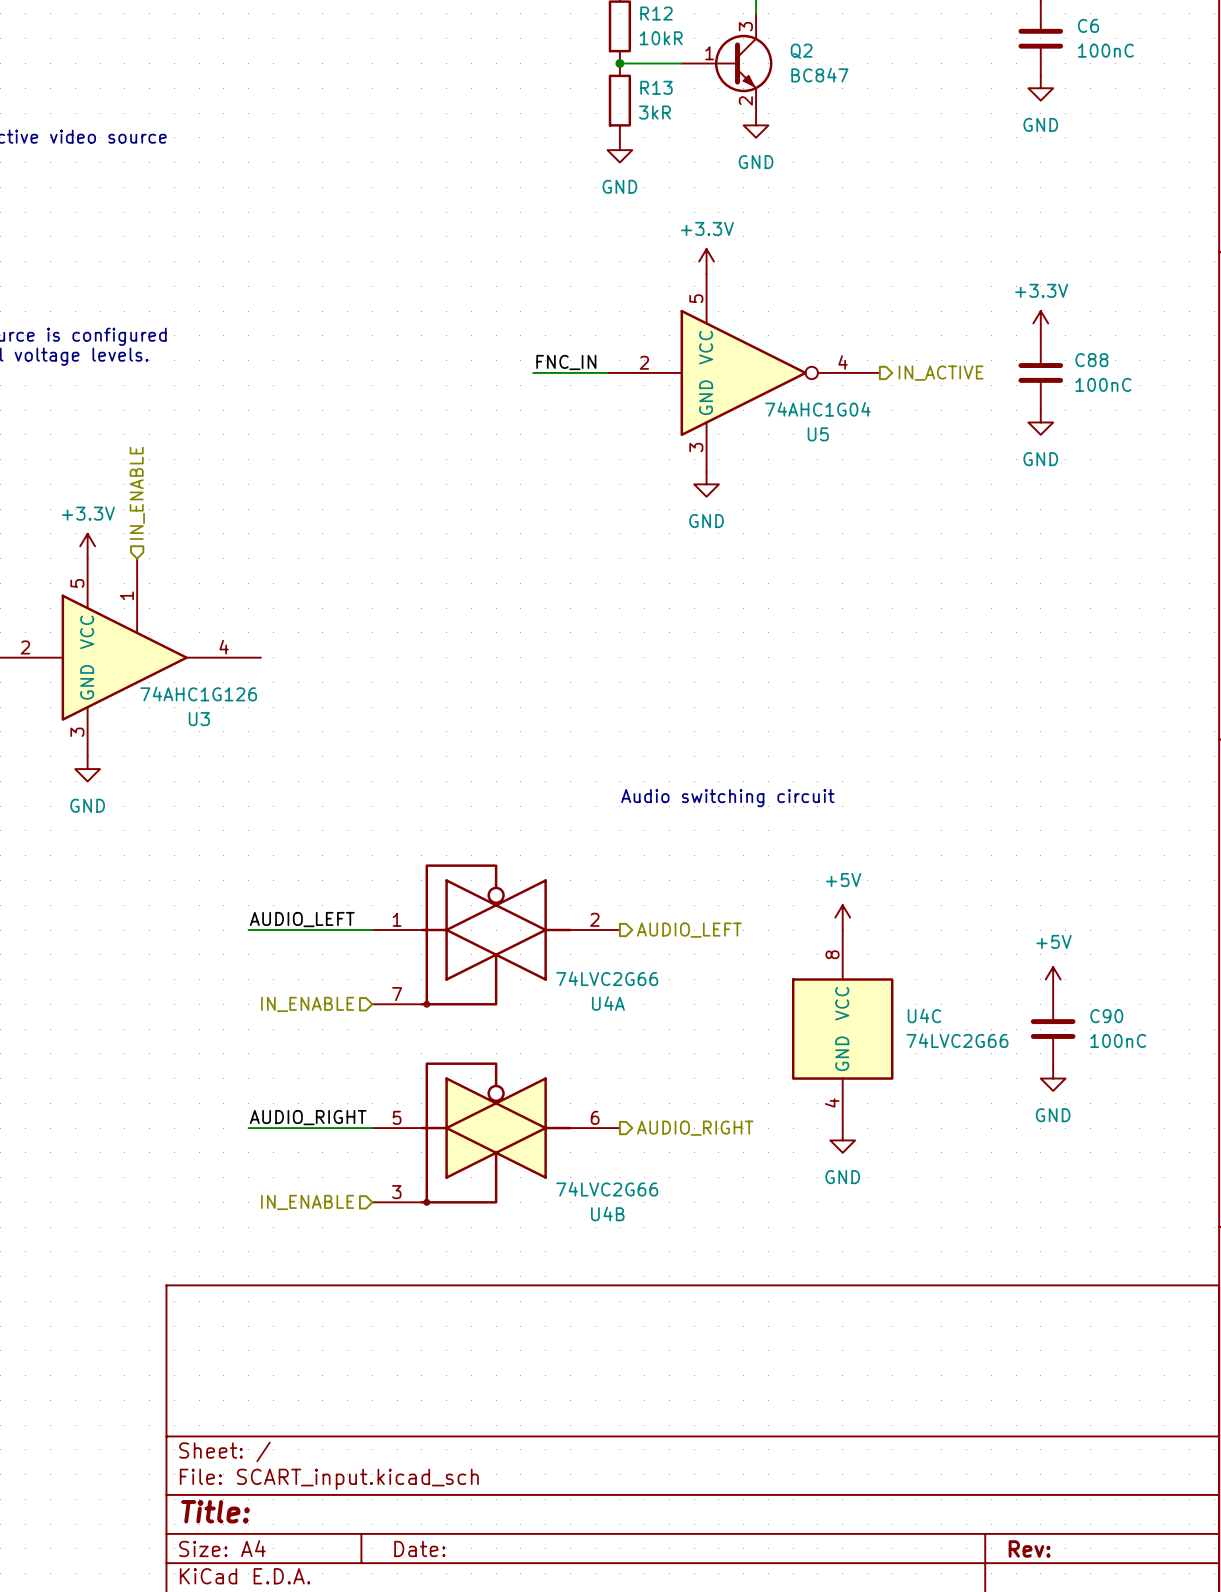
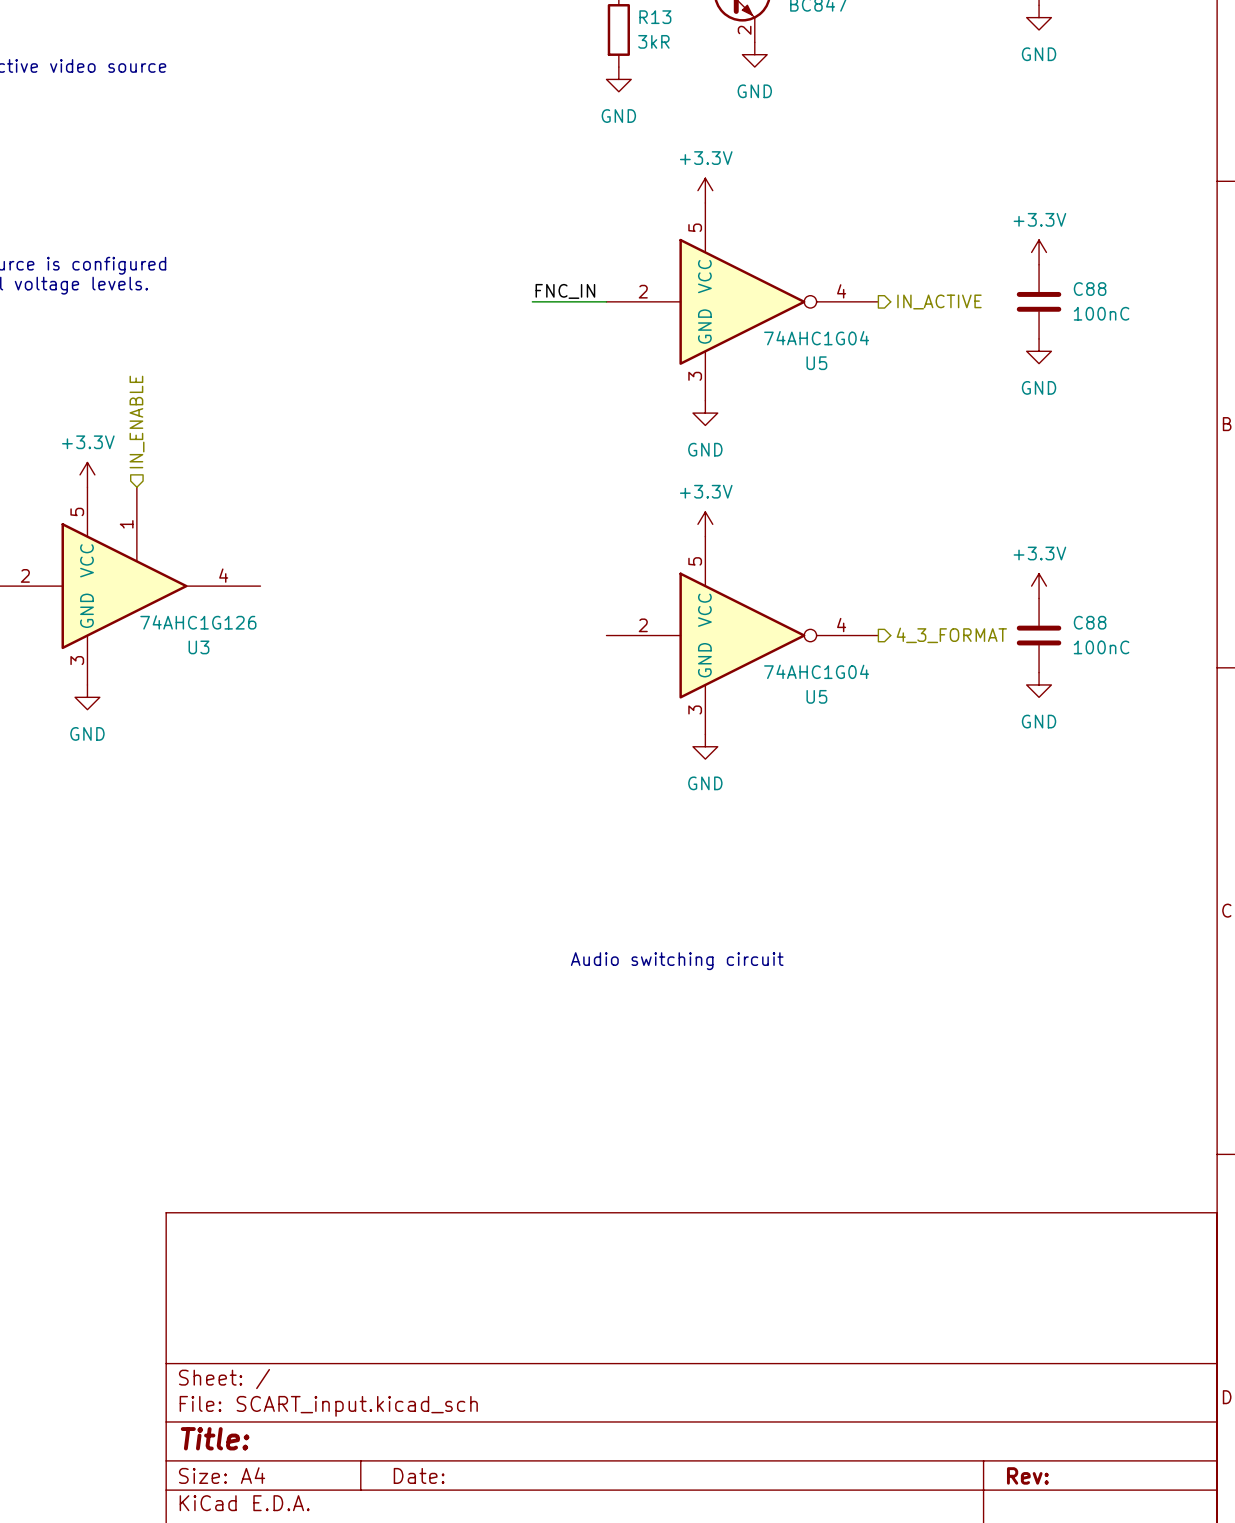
power symbol: none -> +3.3V (705, 524)
power symbol: none -> +3.3V (1039, 586)
U5: none -> 74AHC1G04 (742, 635)
hierarchical label: none -> 4_3_FORMAT (951, 635)
C88: none -> 100nC (1039, 635)
power symbol: none -> GND (1039, 684)
text position: Audio switching circuit (727, 798) -> Audio switching circuit (677, 961)
power symbol: none -> GND (705, 746)
power symbol: +5V (842, 917) -> none
label: AUDIO_LEFT (302, 919) -> none
wire: (248, 930) (372, 930) -> none
hierarchical label: AUDIO_LEFT (689, 930) -> none
U4A: 74LVC2G66 (496, 935) -> none
power symbol: +5V (1053, 979) -> none
hierarchical label: IN_ENABLE (307, 1004) -> none
U4C: 74LVC2G66 (842, 1029) -> none
C90: 100nC (1053, 1029) -> none
power symbol: GND (1053, 1078) -> none
label: AUDIO_RIGHT (308, 1117) -> none
wire: (248, 1128) (372, 1128) -> none
hierarchical label: AUDIO_RIGHT (695, 1128) -> none
U4B: 74LVC2G66 (496, 1133) -> none
power symbol: GND (842, 1140) -> none
hierarchical label: IN_ENABLE (307, 1202) -> none

